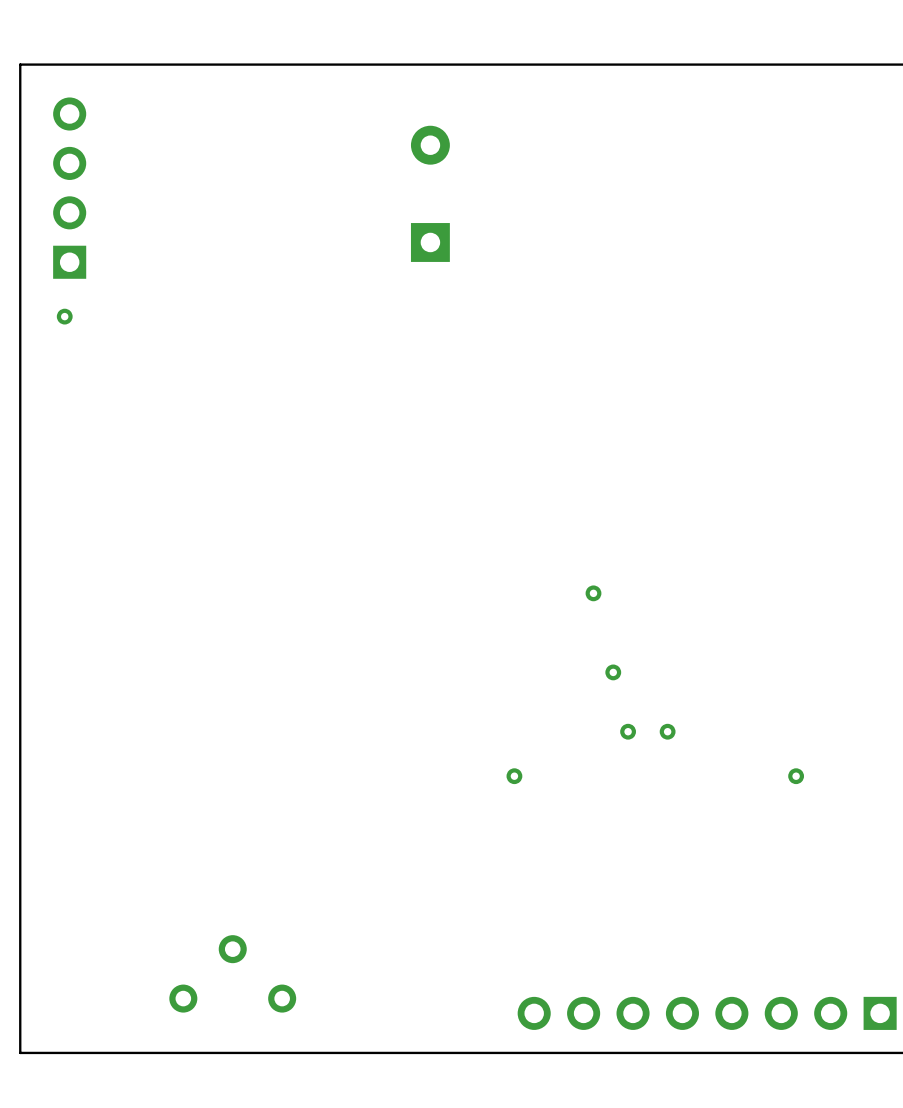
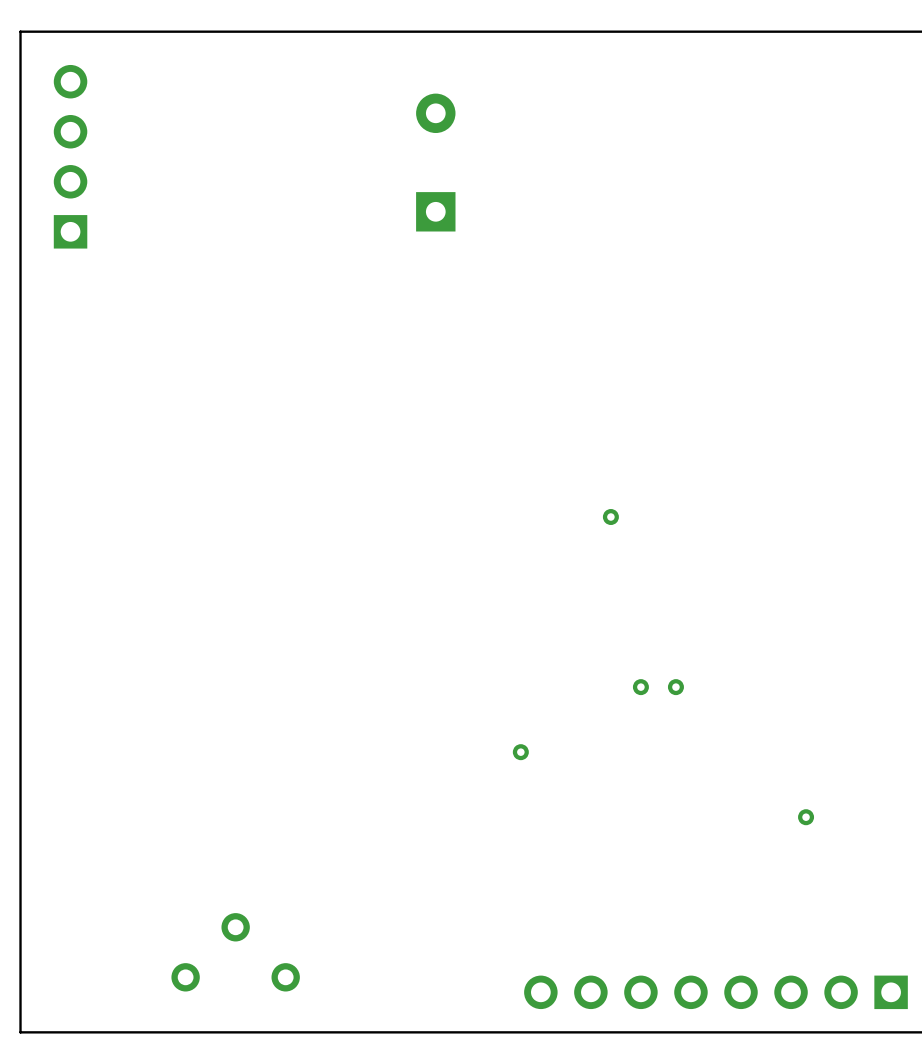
part: (64, 316) -> none
part position: (593, 593) -> (610, 517)
part: (613, 672) -> none
part: none -> (640, 687)
part: none -> (675, 687)
part: (628, 731) -> none
part: (667, 731) -> none
part position: (796, 776) -> (806, 817)

